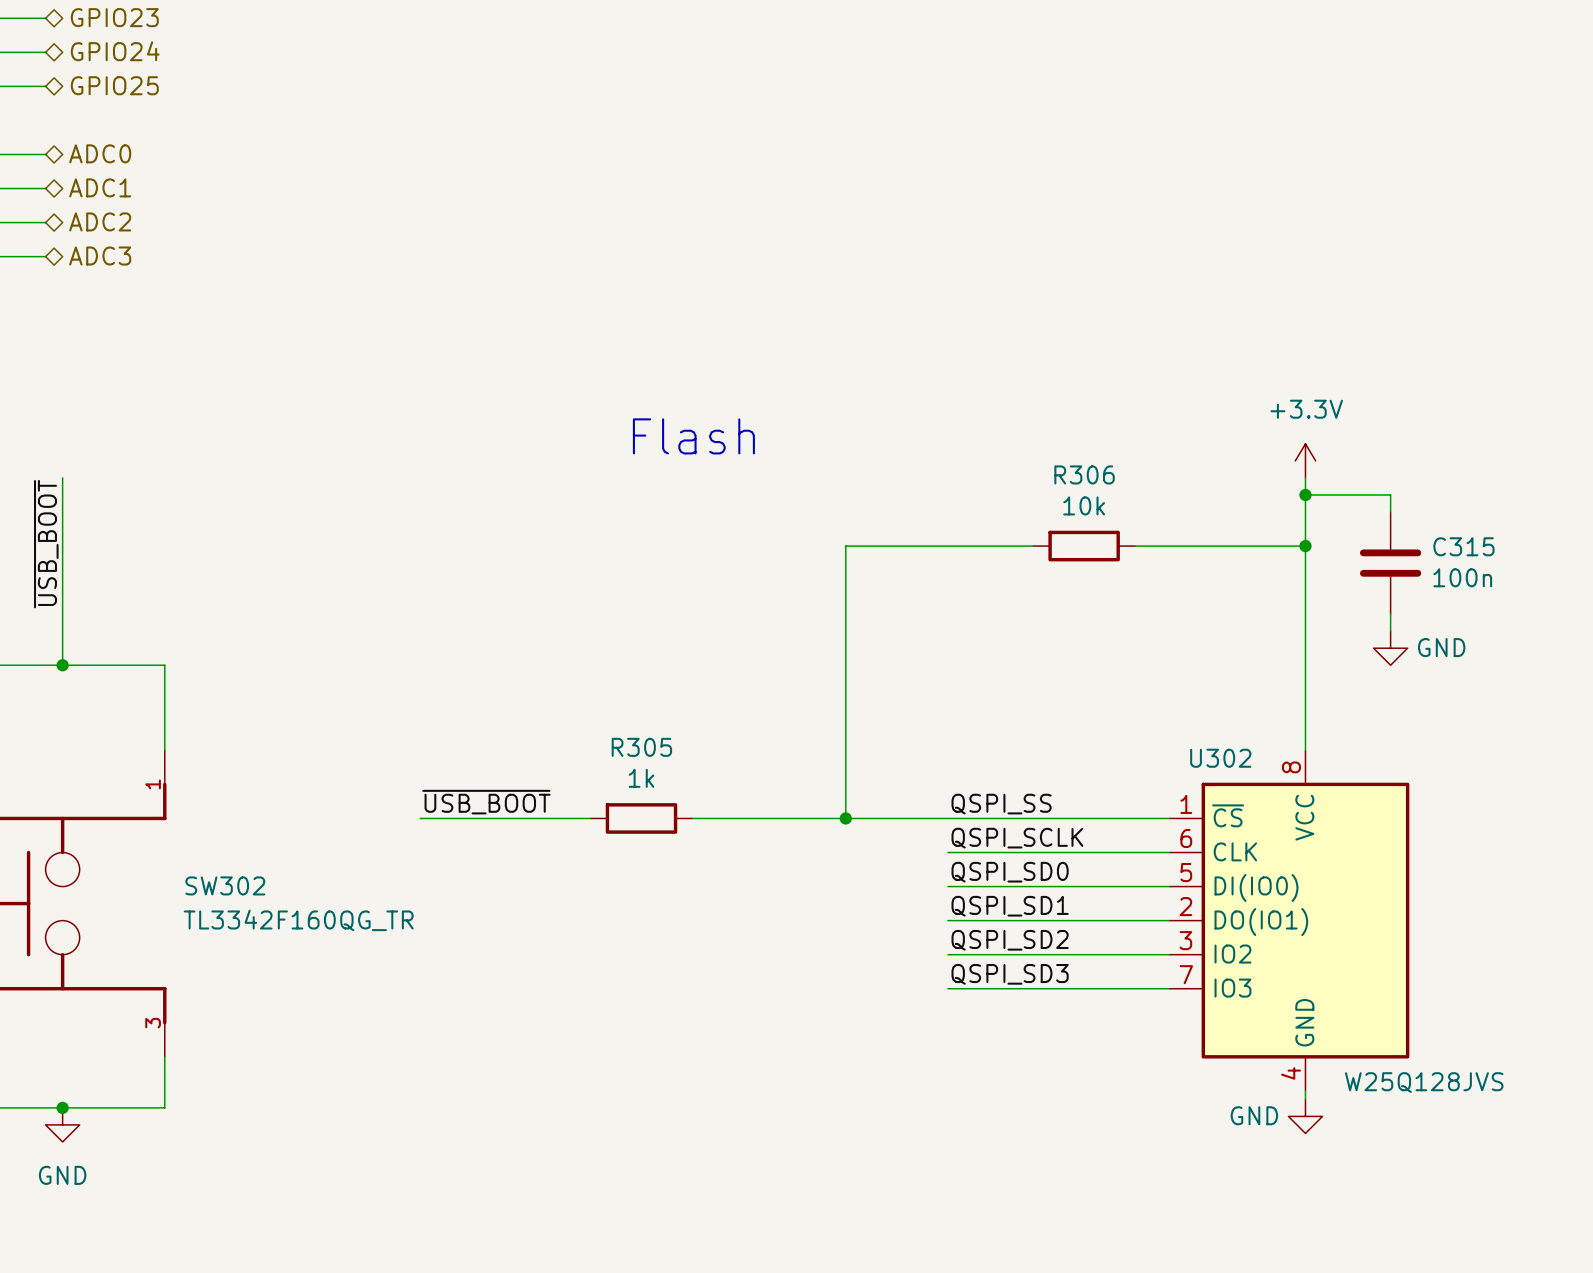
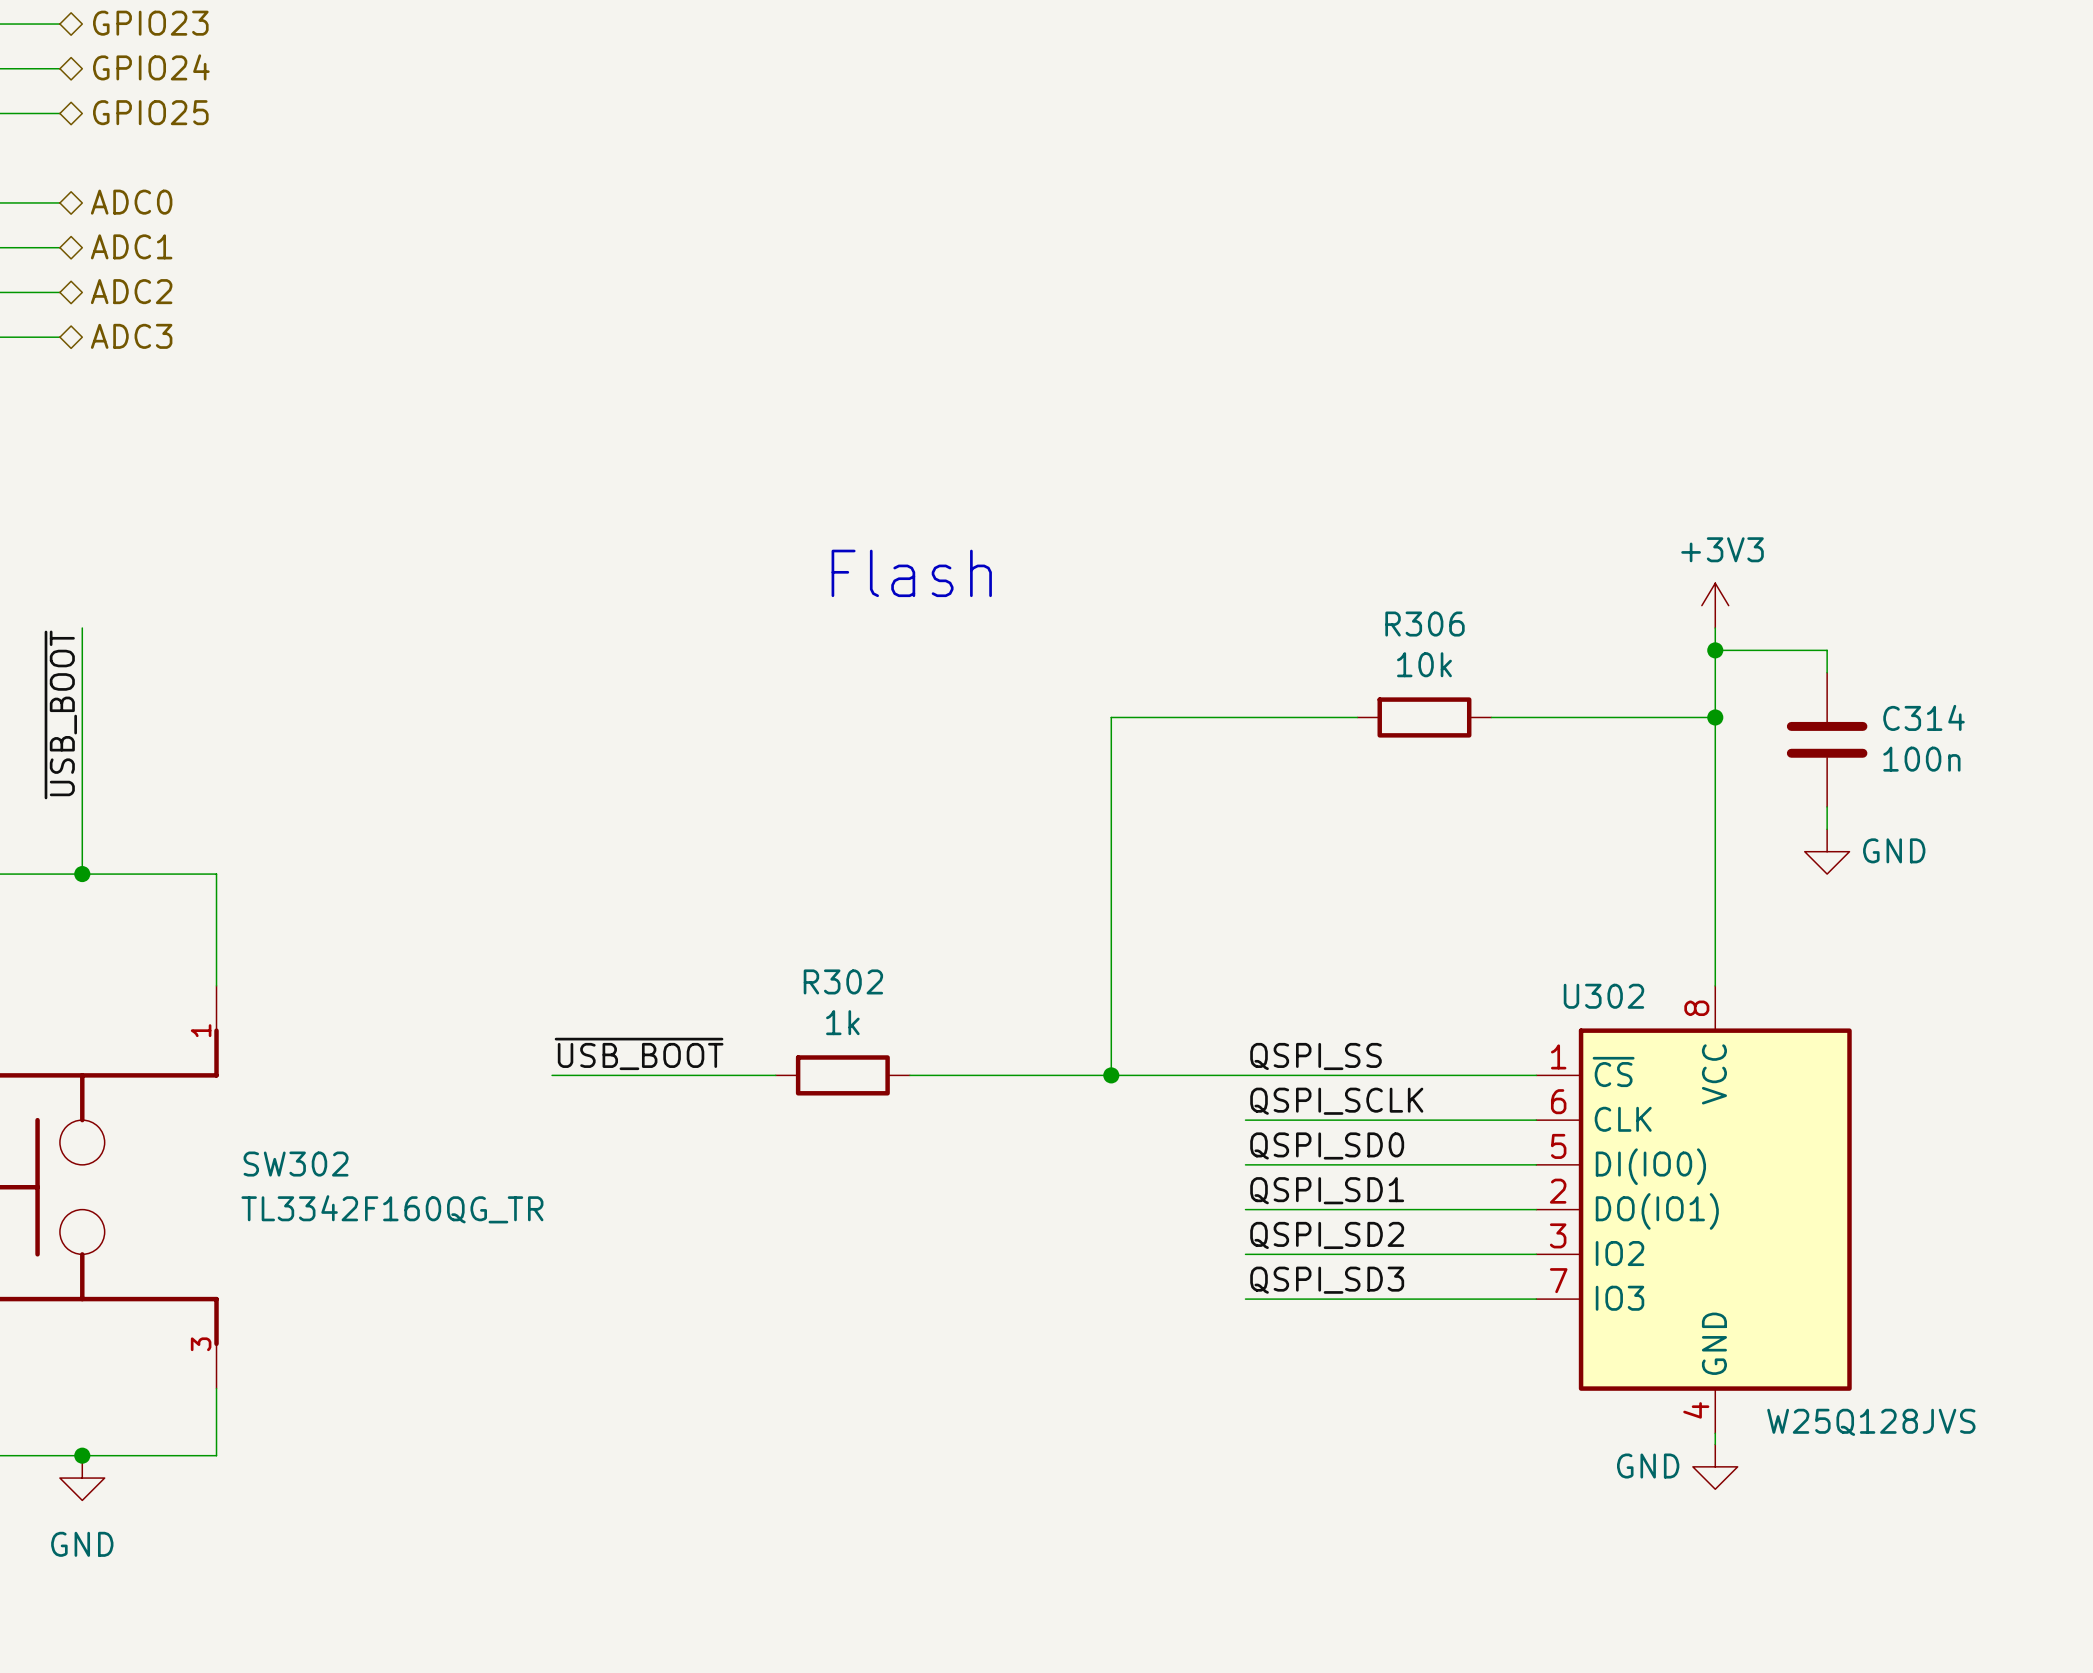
power symbol: +3.3V (1305, 460) -> +3V3 (1715, 605)
C315 name: C315 (1463, 546) -> C314 (1924, 717)
R305 name: R305 (641, 747) -> R302 (843, 981)

